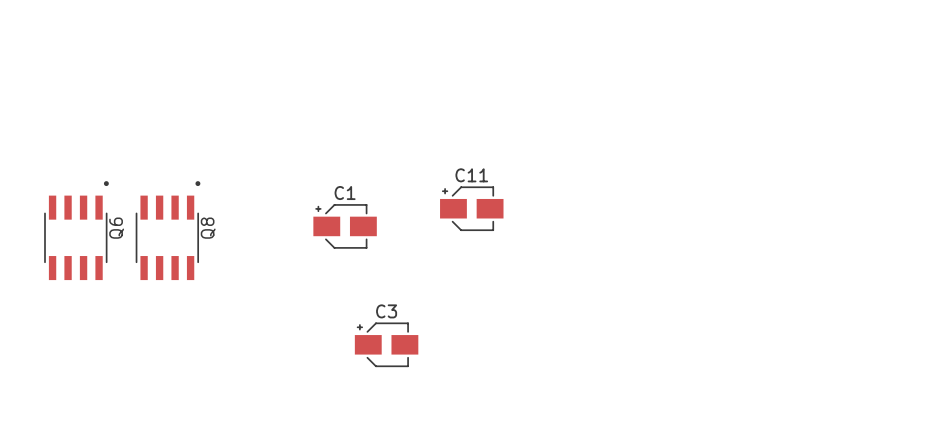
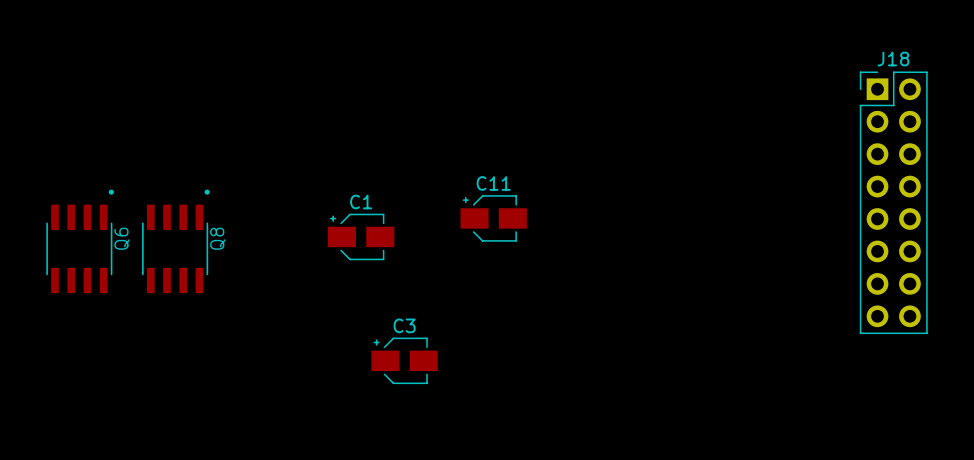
J18: none -> (893, 202)

